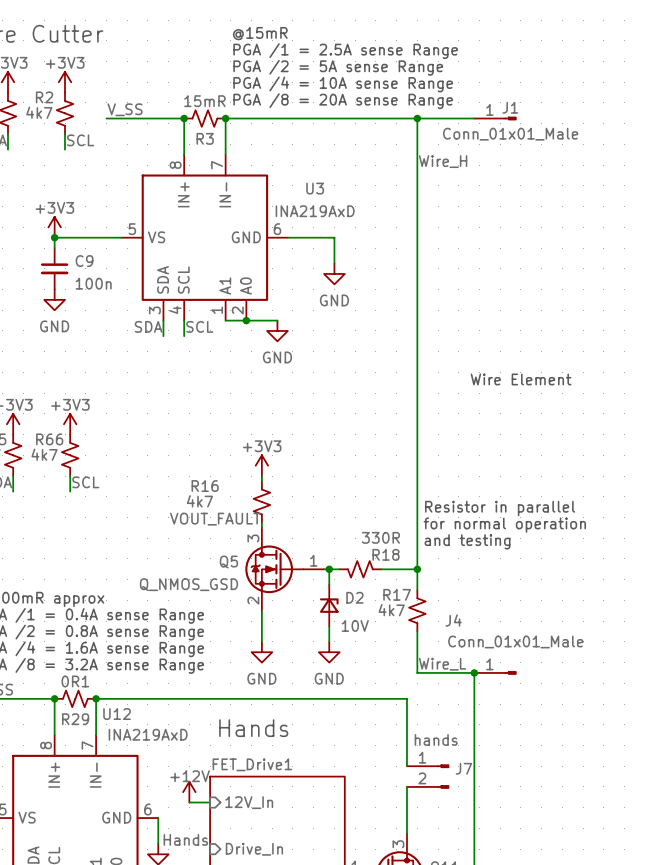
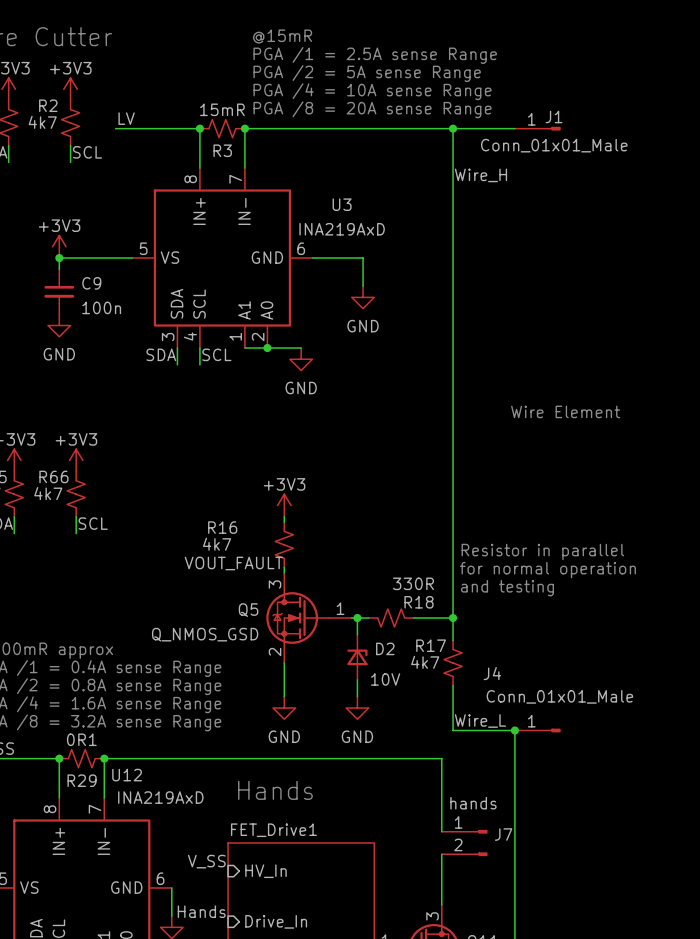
label: V_SS (125, 109) -> LV (126, 118)
power symbol: +12V (189, 792) -> none
label: none -> V_SS (206, 861)
wire: (189, 802) (210, 802) -> none
sheet pin: 12V_In (249, 802) -> HV_In (265, 871)

